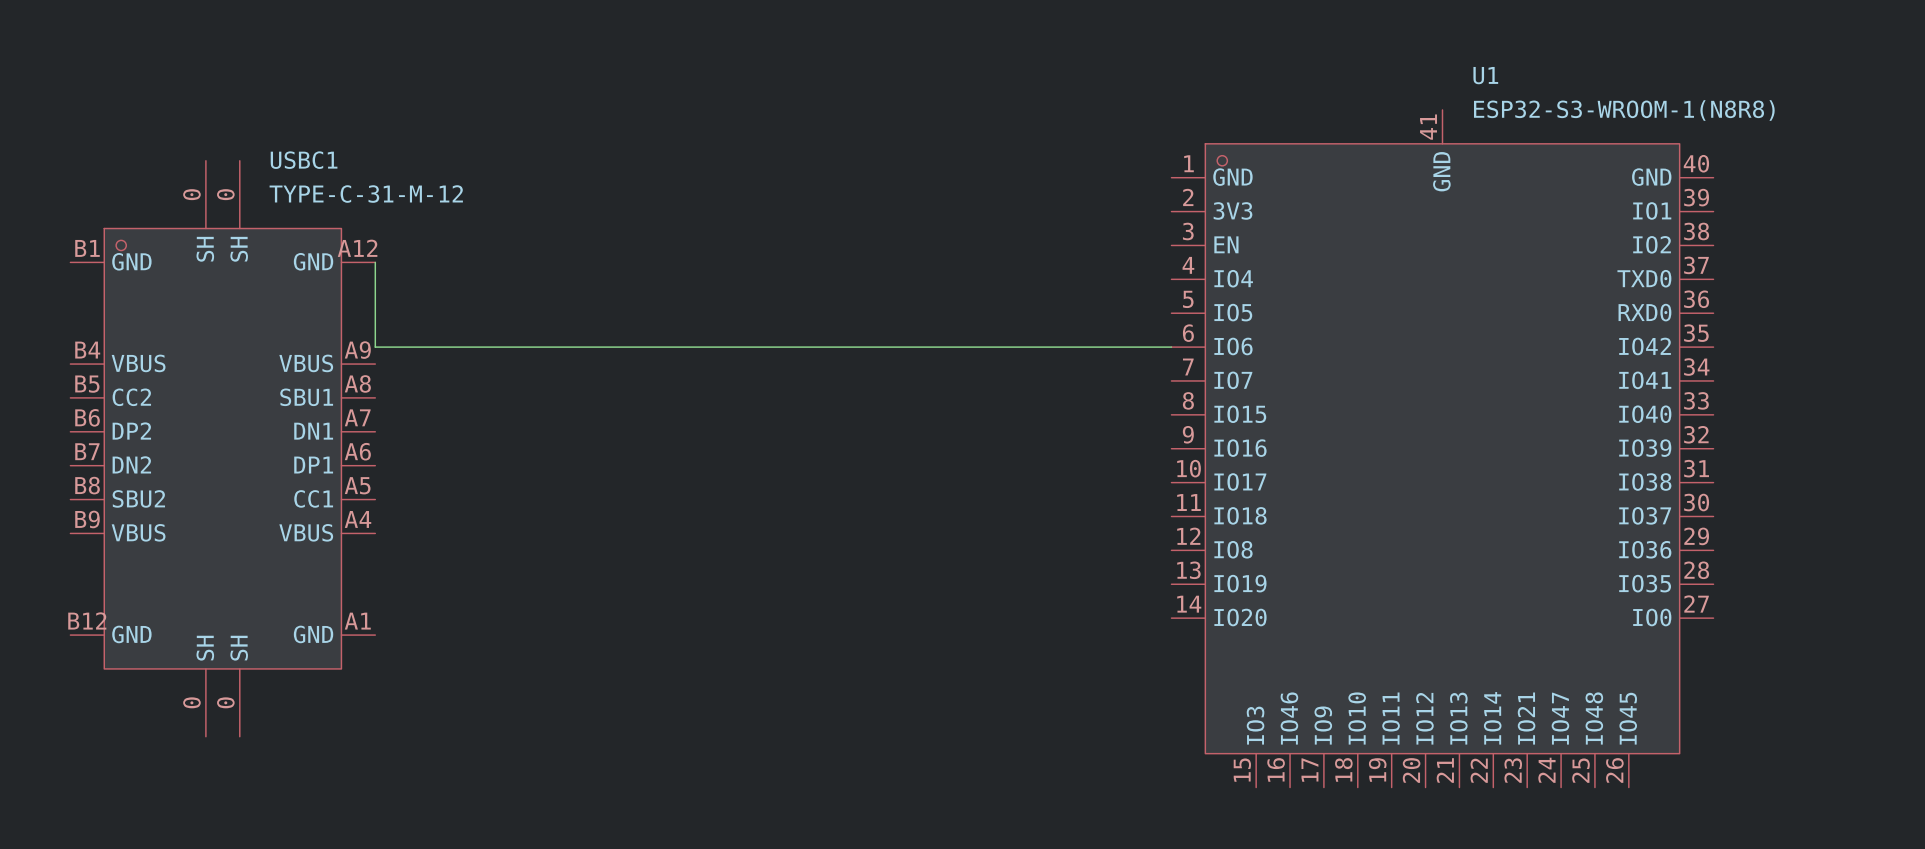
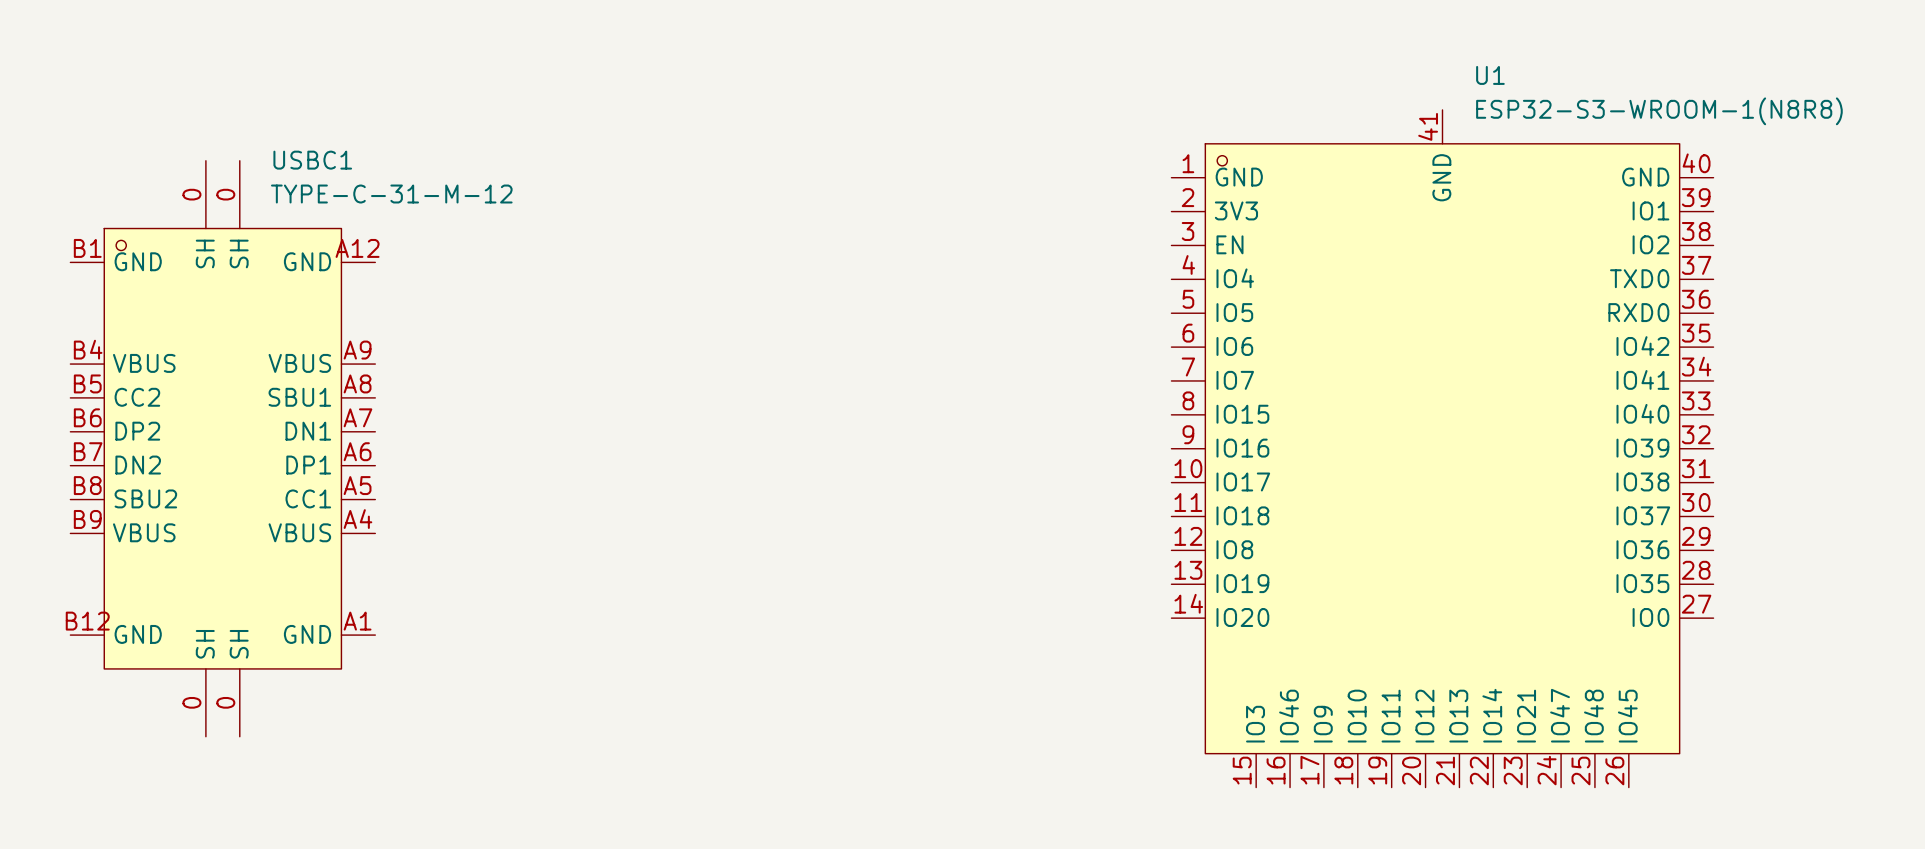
wire: (375, 262) (375, 347) (1171, 347) -> none

